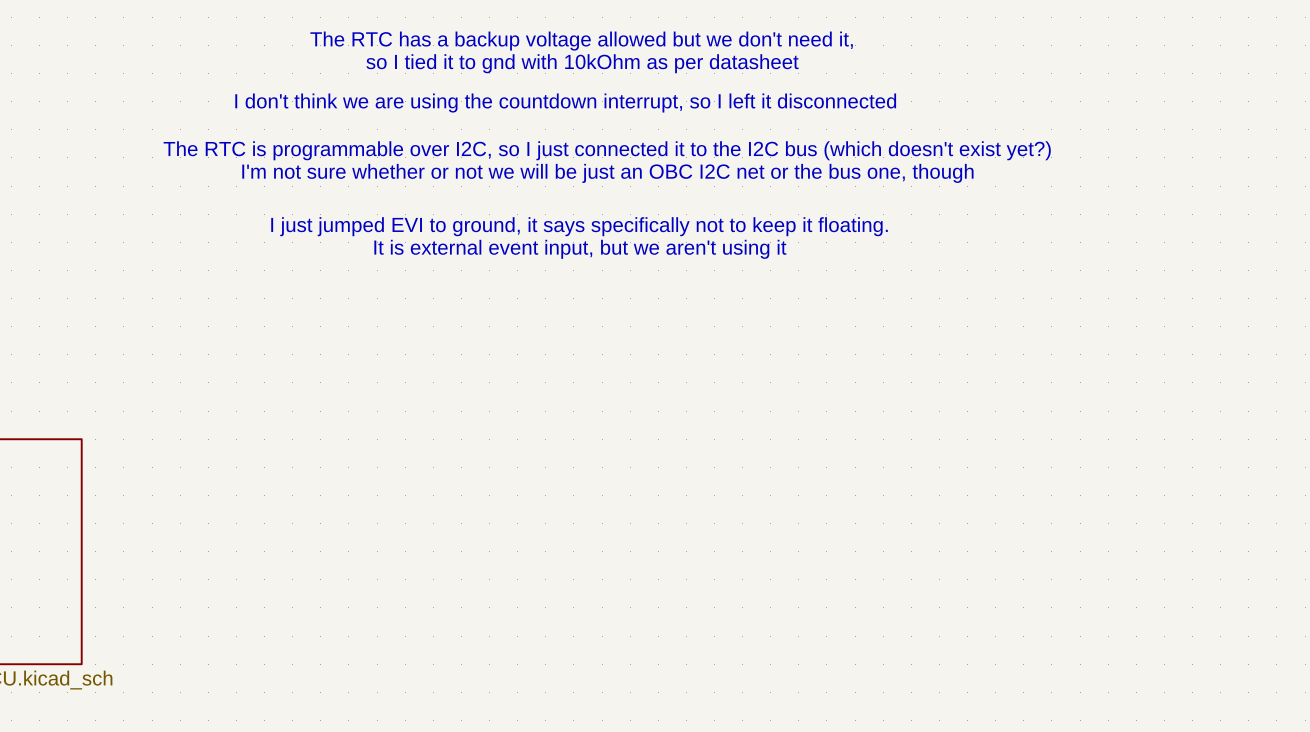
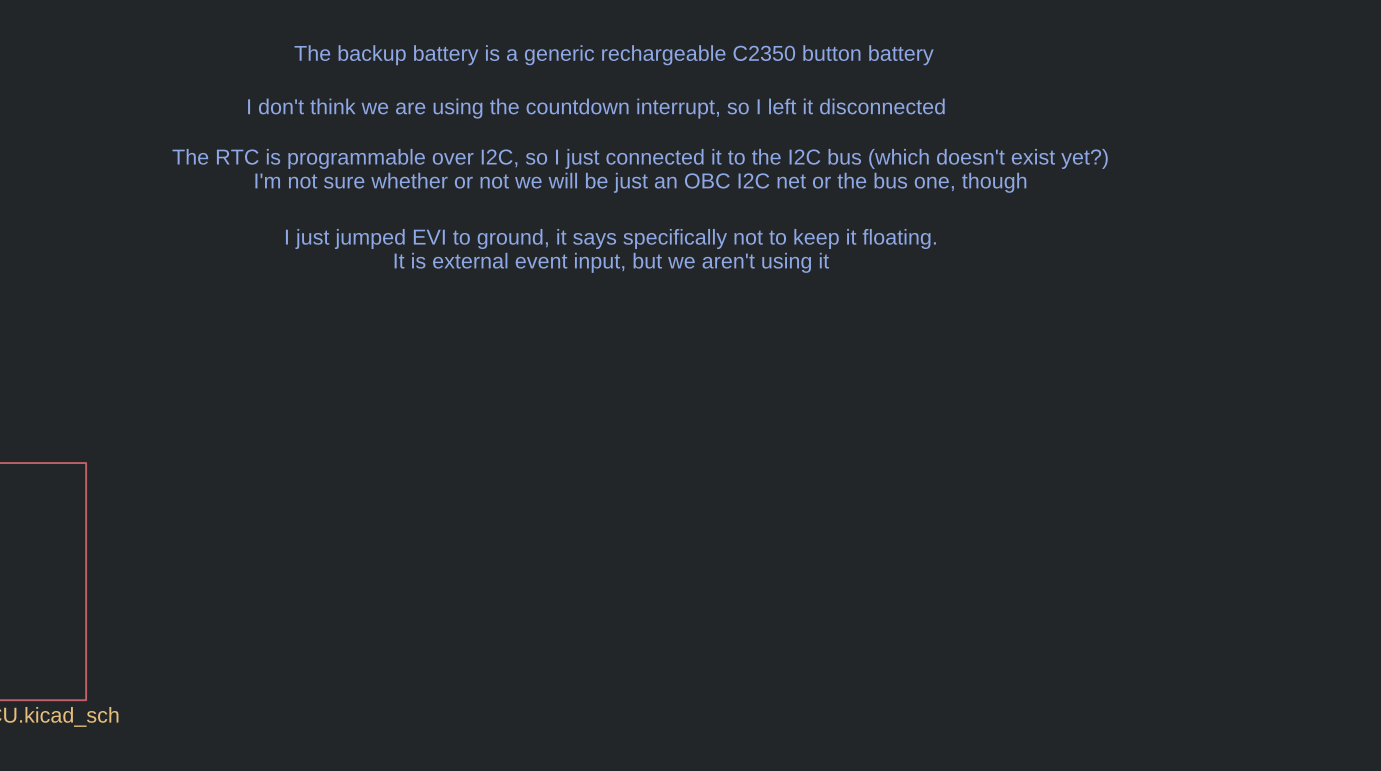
text: The RTC has a backup voltage allowed but we don't need it, (581, 41) -> none
text: none -> The backup battery is a generic rechargeable C2350 button battery (614, 55)
text: so I tied it to gnd with 10kOhm as per datasheet (582, 63) -> none

